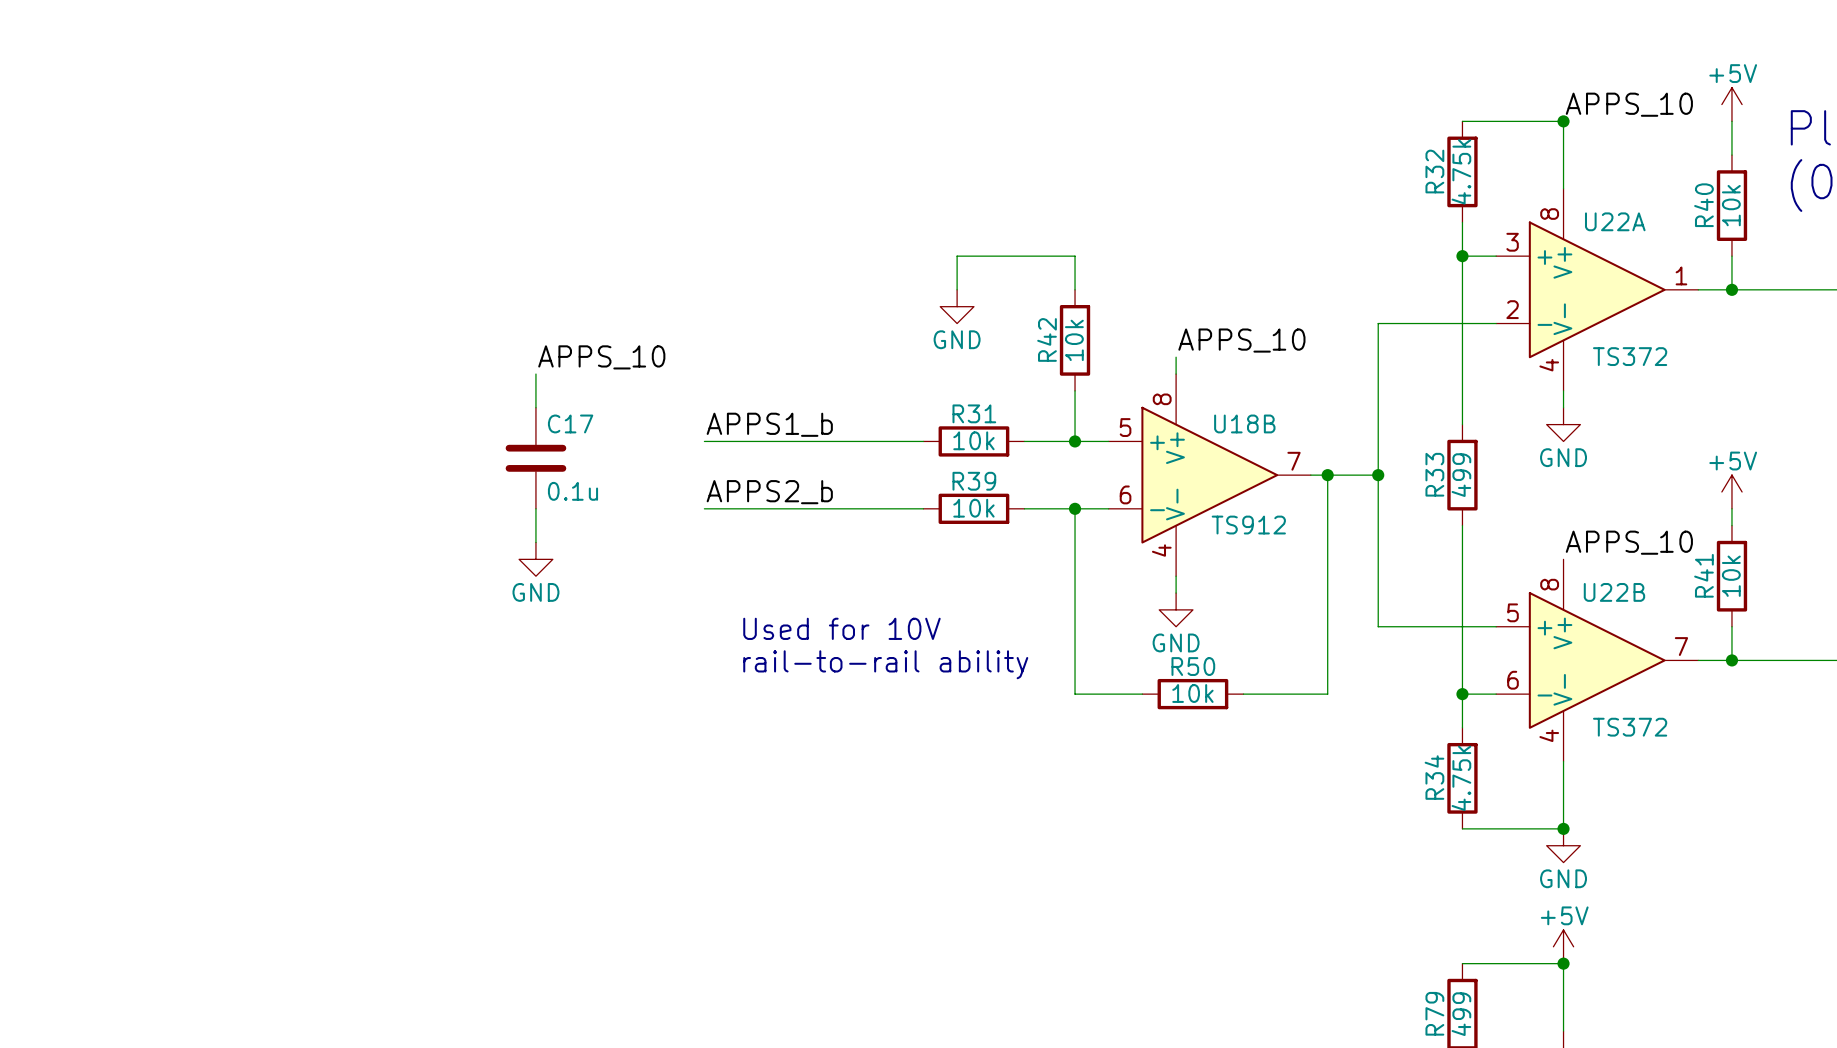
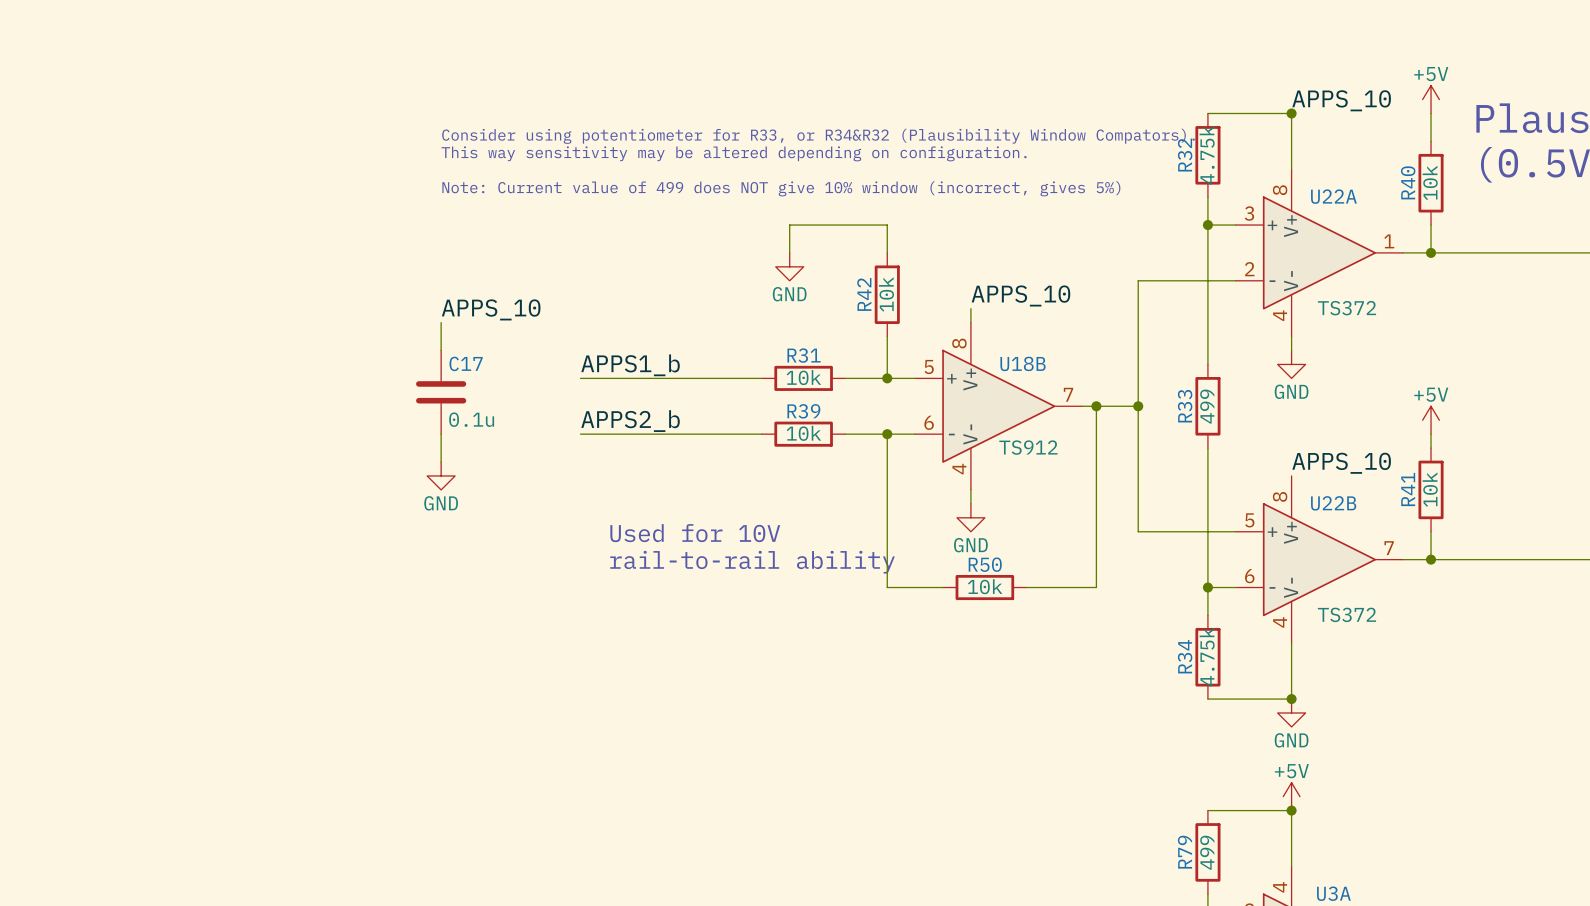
text: none -> Consider using potentiometer for R33, or R34&R32 (Plausibility Window Compators). (818, 136)
text: none -> This way sensitivity may be altered depending on configuration. (734, 153)
text: none -> Note: Current value of 499 does NOT give 10% window (incorrect, gives 5%) (781, 188)

